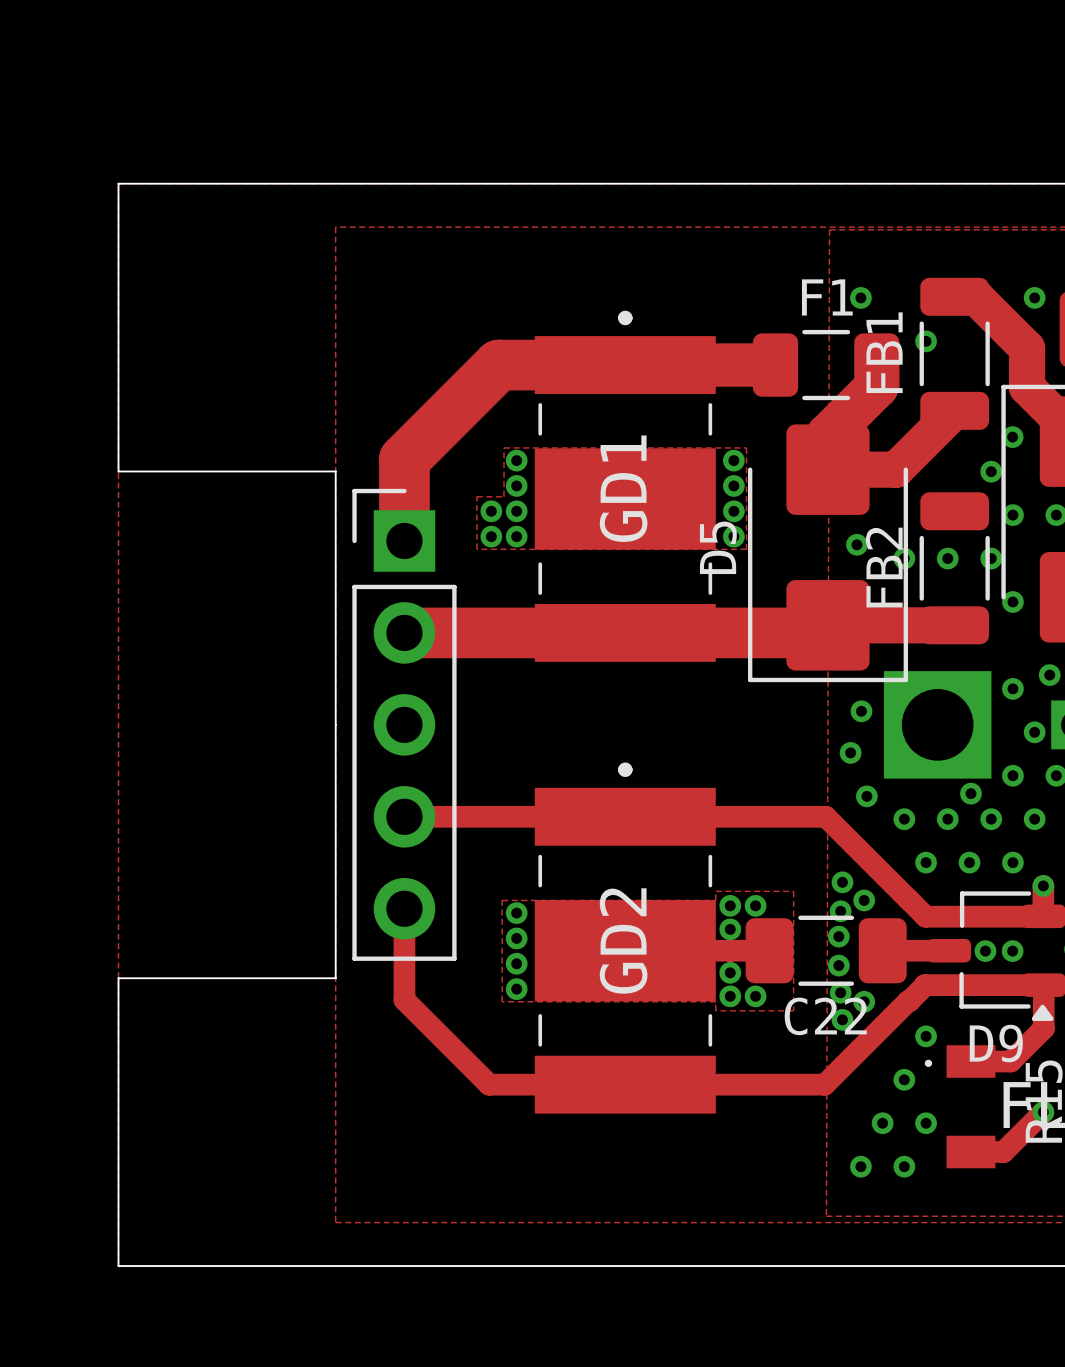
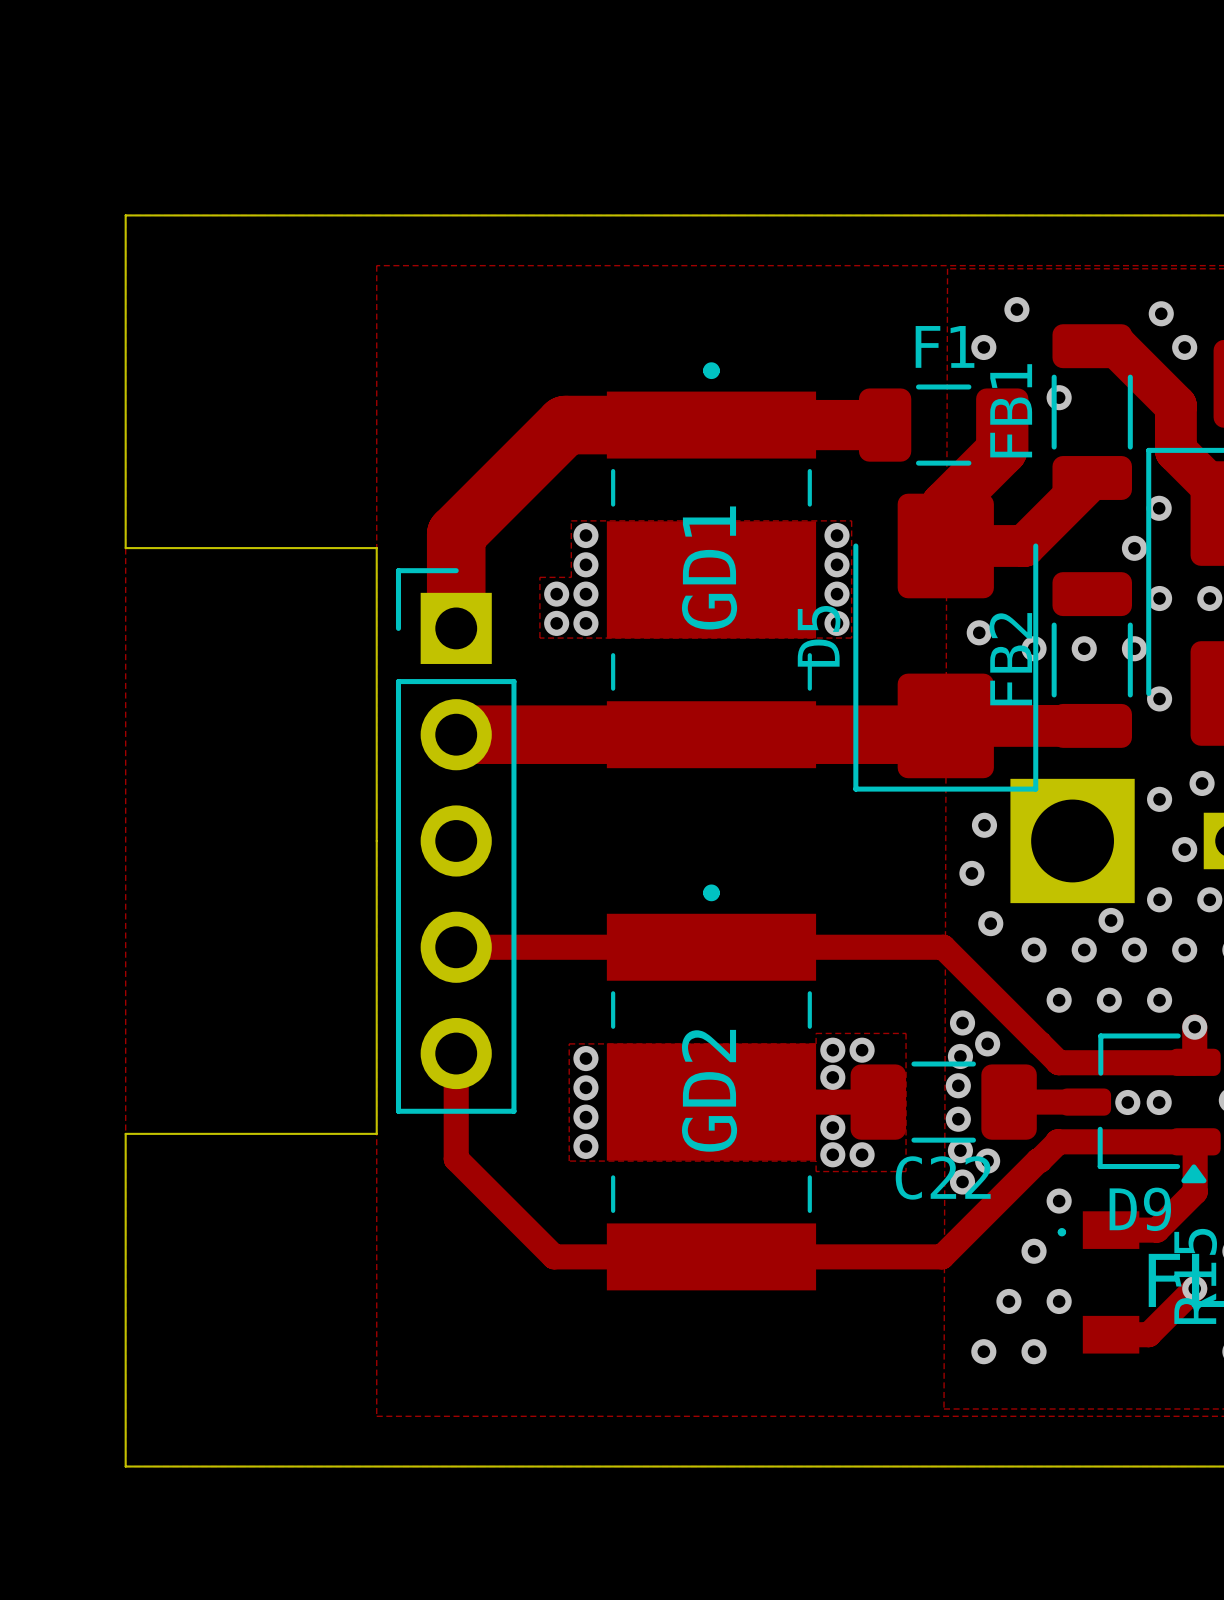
via: none -> (1016, 309)
via: none -> (1161, 313)

